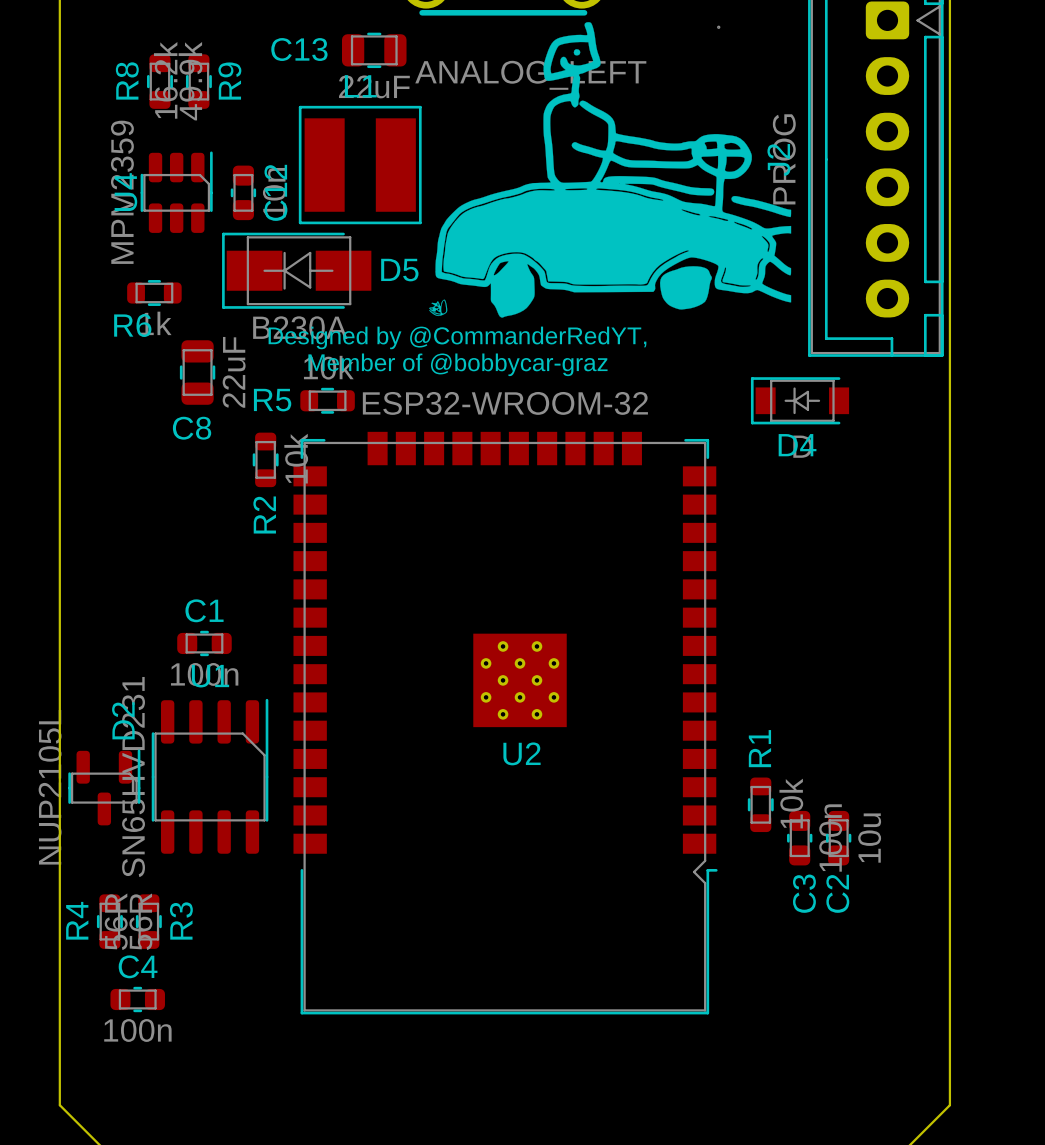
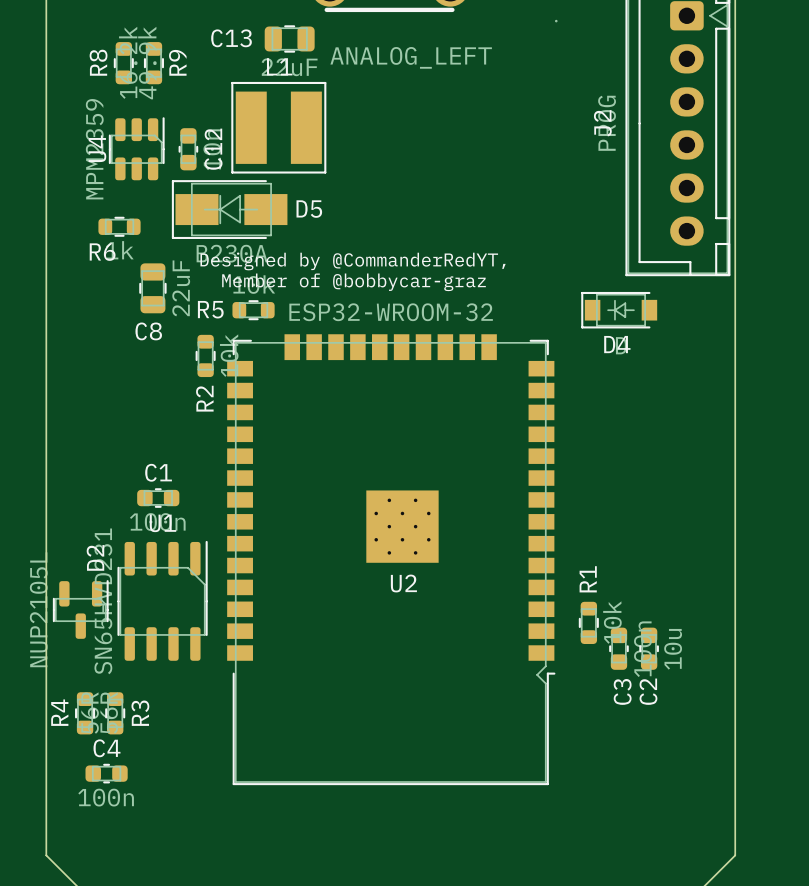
drawing: [429, 22, 792, 318] -> none

